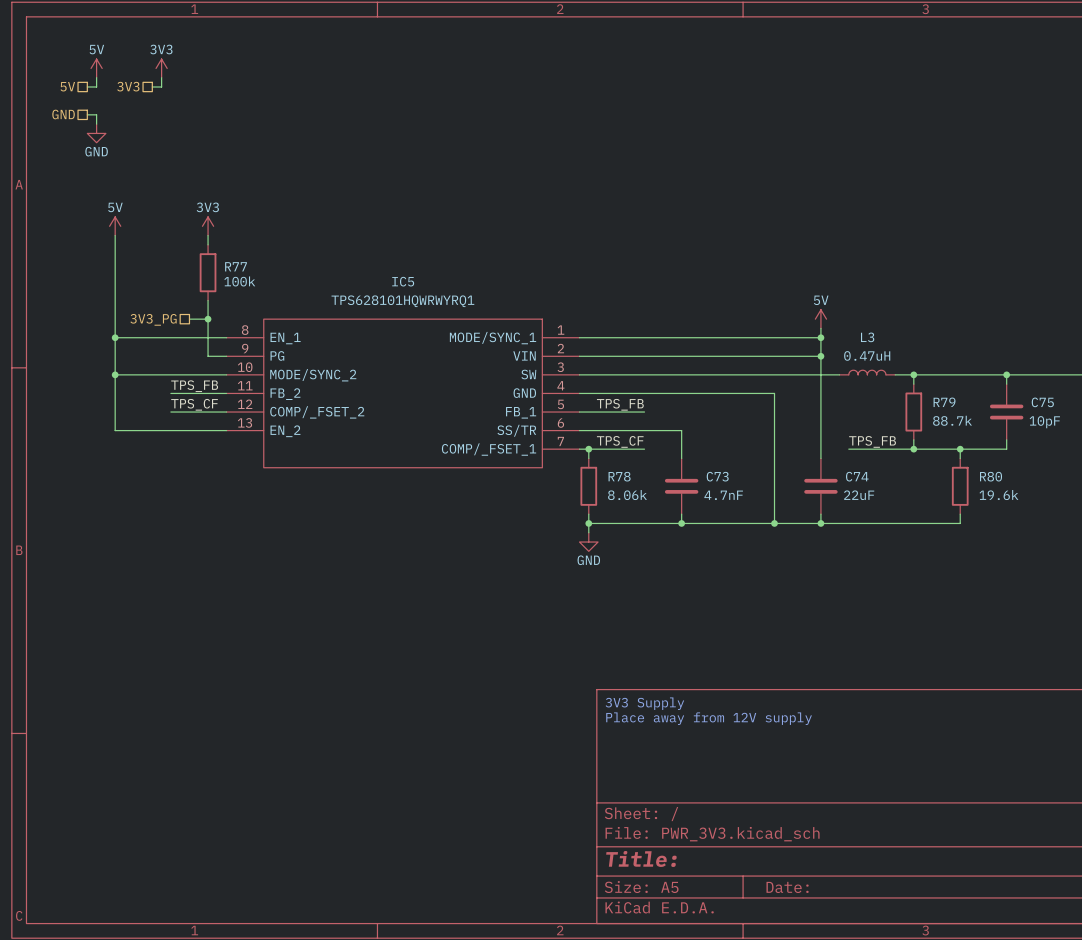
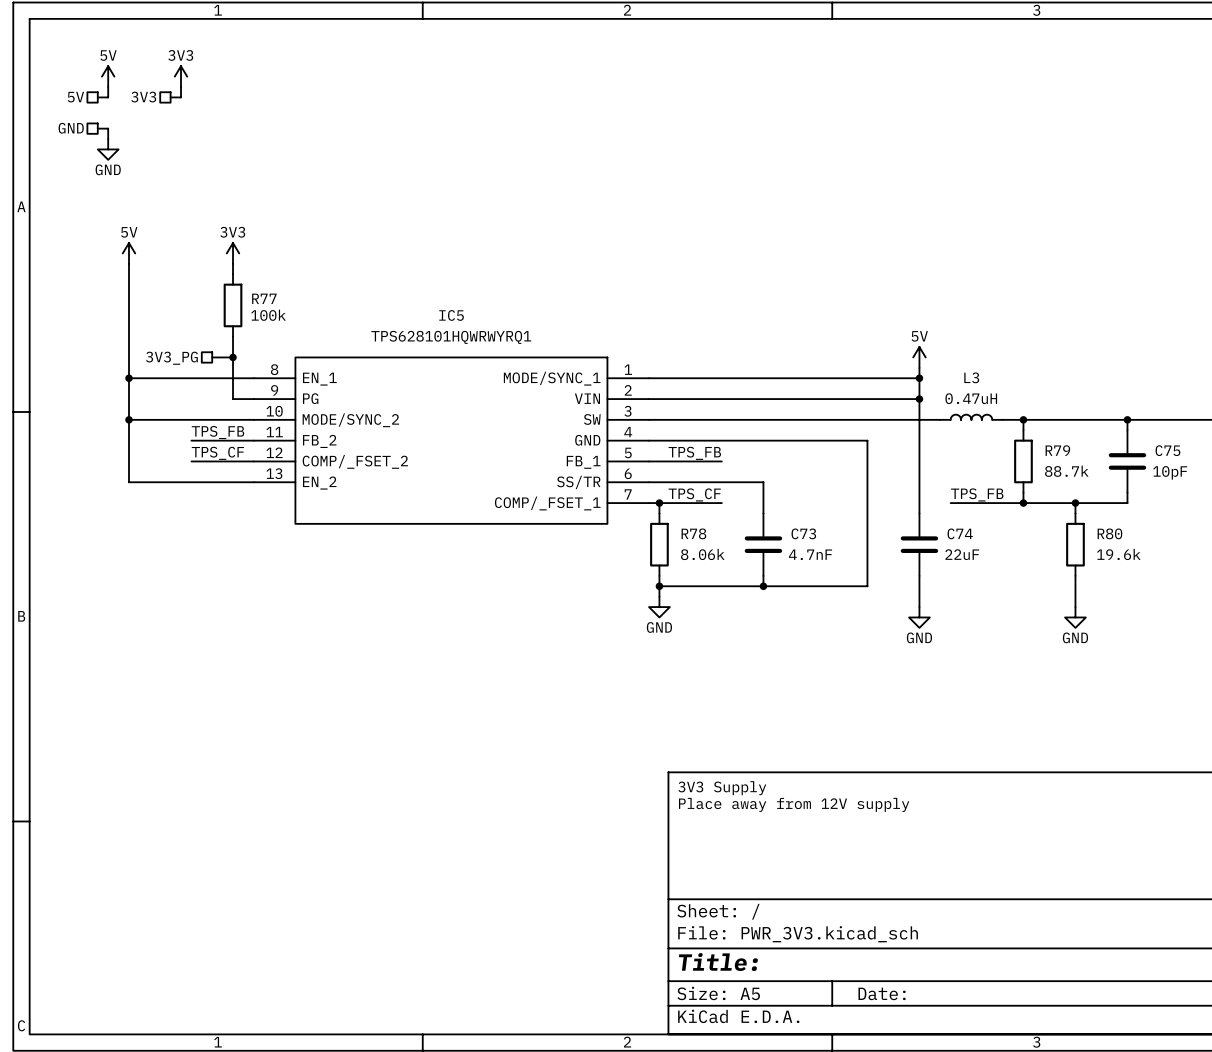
wire: (774, 523) (960, 523) -> (1075, 607) (1075, 586)
junction: (774, 523) -> none
wire: none -> (919, 586) (919, 607)
junction: (820, 523) -> none
power symbol: none -> GND (919, 617)
power symbol: none -> GND (1075, 617)

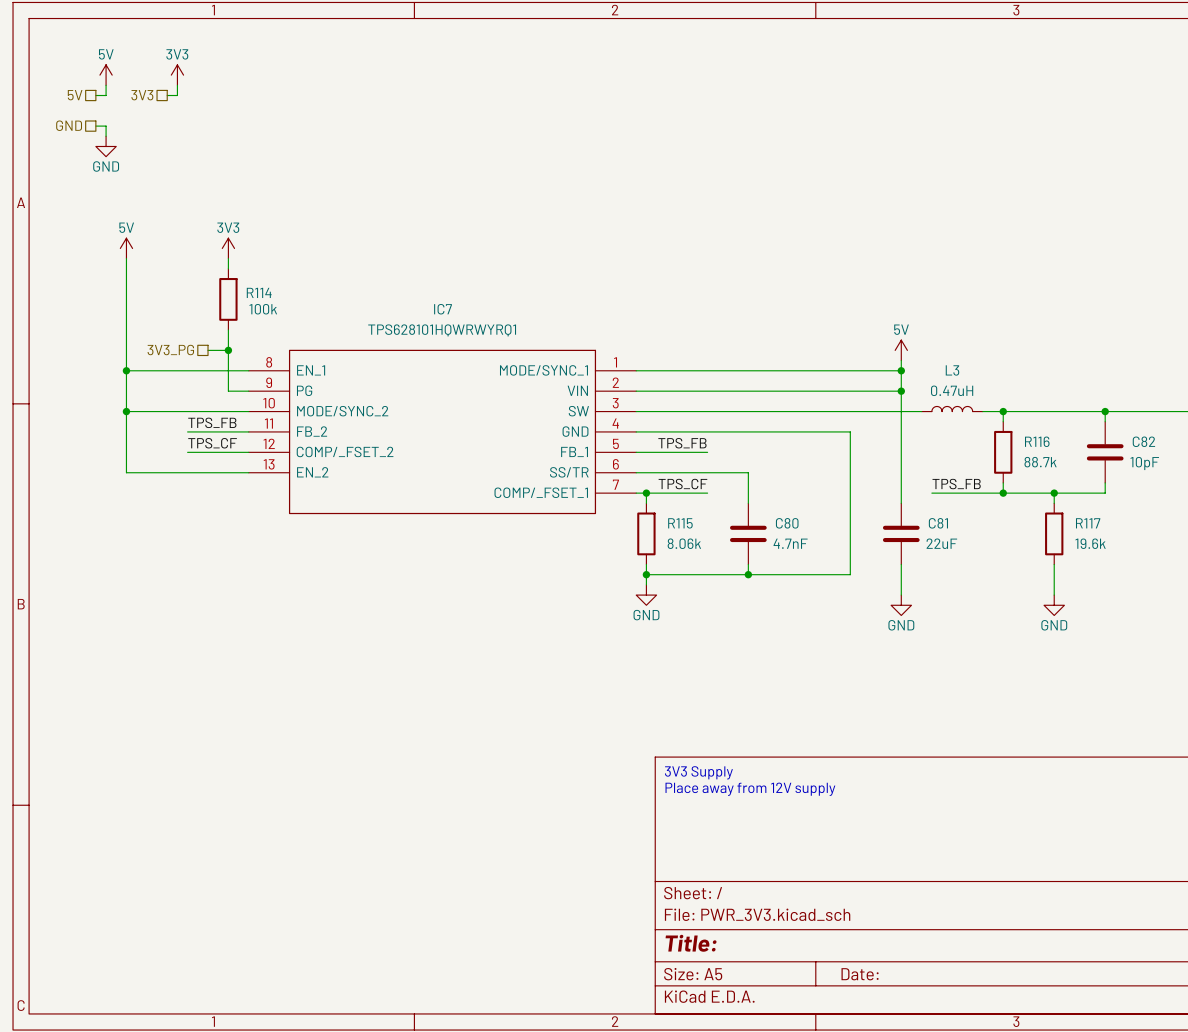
R77 name: R77 (264, 298) -> R114 (259, 292)
IC5 name: IC5 (451, 315) -> IC7 (443, 309)
R79 name: R79 (1057, 450) -> R116 (1037, 441)
C75 name: C75 (1167, 450) -> C82 (1143, 441)
R78 name: R78 (693, 533) -> R115 (680, 523)
C73 name: C73 (803, 533) -> C80 (787, 523)
C74 name: C74 (960, 533) -> C81 (938, 523)
R80 name: R80 (1109, 533) -> R117 (1088, 523)

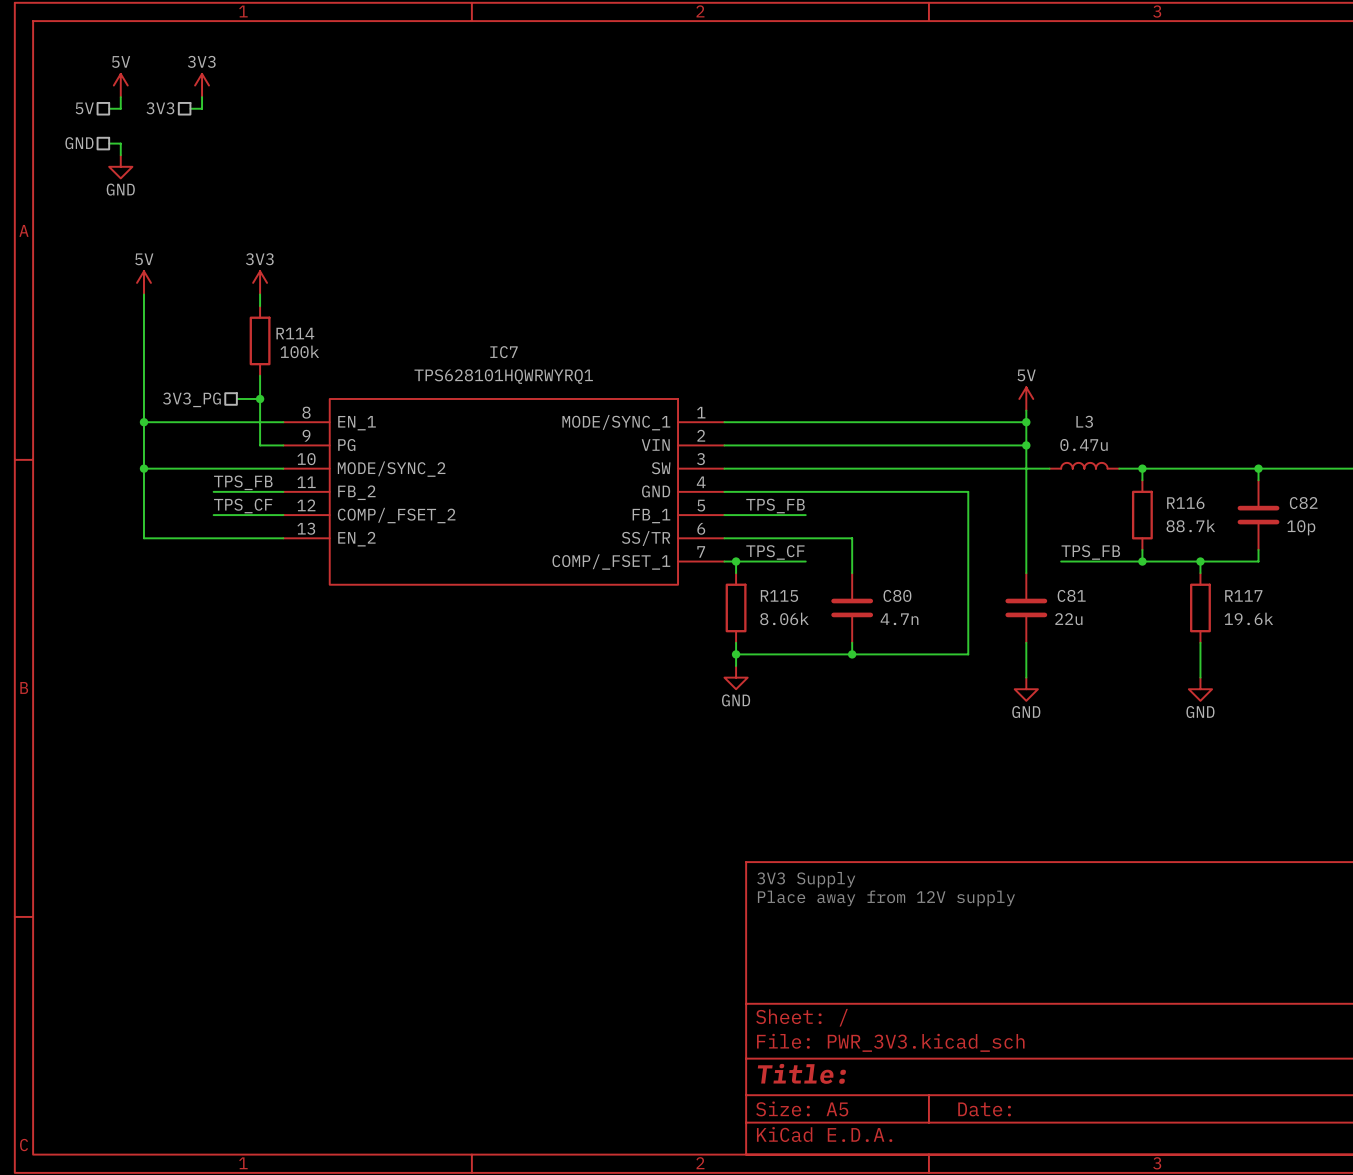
L3 value: 0.47uH (952, 390) -> 0.47u (1084, 445)
C82 value: 10pF (1144, 463) -> 10p (1301, 527)
C80 value: 4.7nF (790, 543) -> 4.7n (899, 619)
C81 value: 22uF (941, 543) -> 22u (1068, 619)

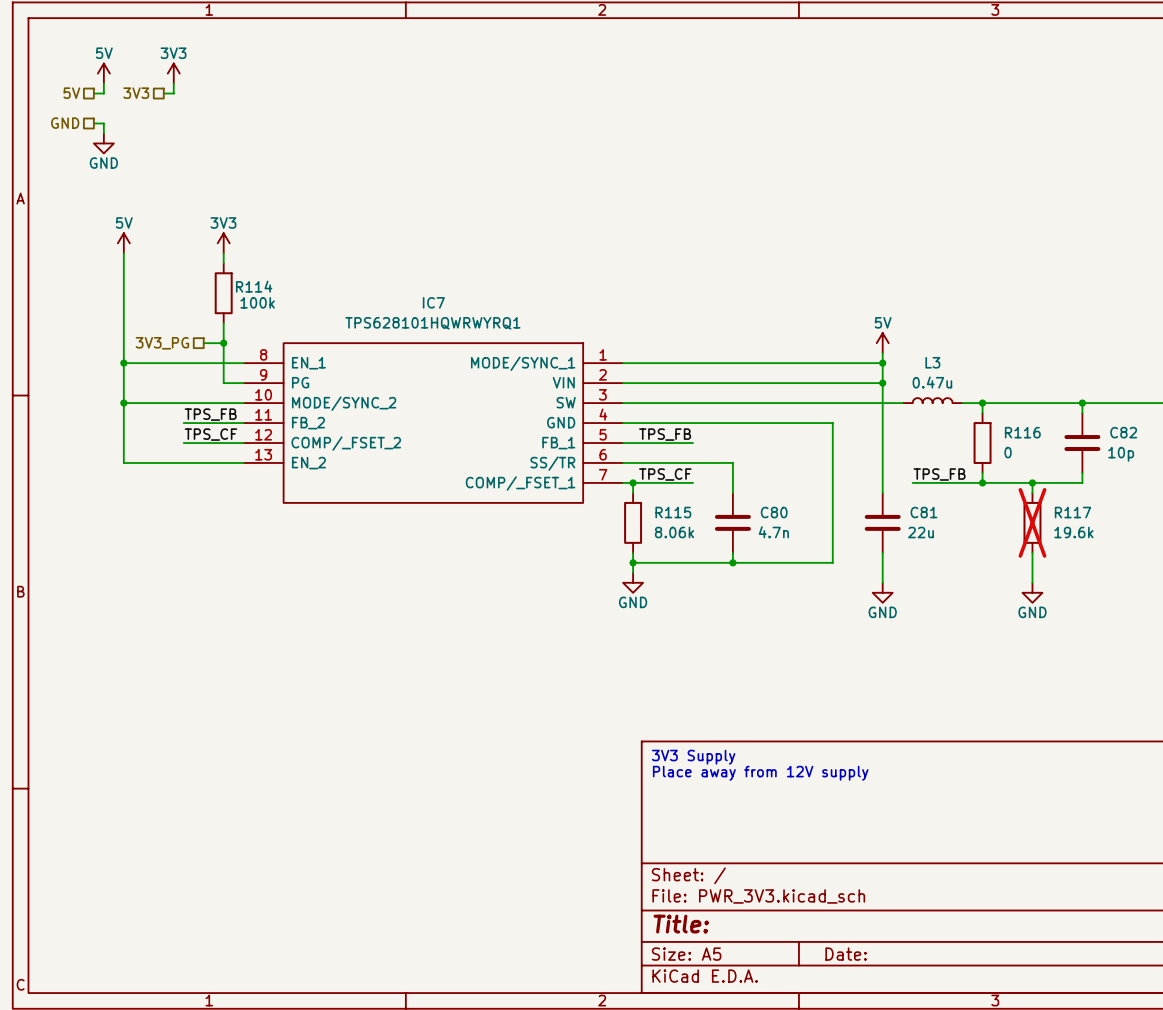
R116 value: 88.7k (1190, 526) -> 0 (1008, 452)
R117 do-not-place cross: none -> (1032, 522)

